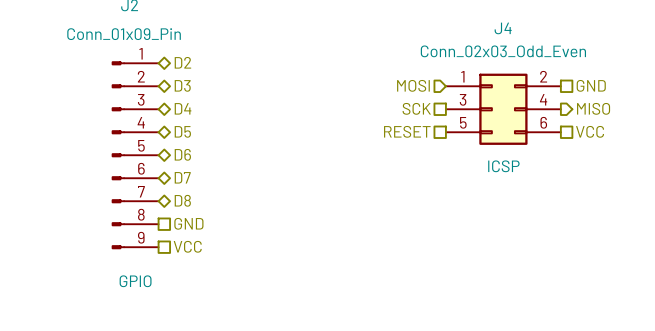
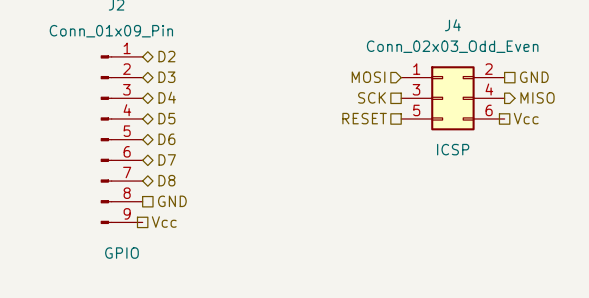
hierarchical label: VCC (590, 131) -> Vcc (526, 118)
hierarchical label: VCC (187, 246) -> Vcc (164, 222)

